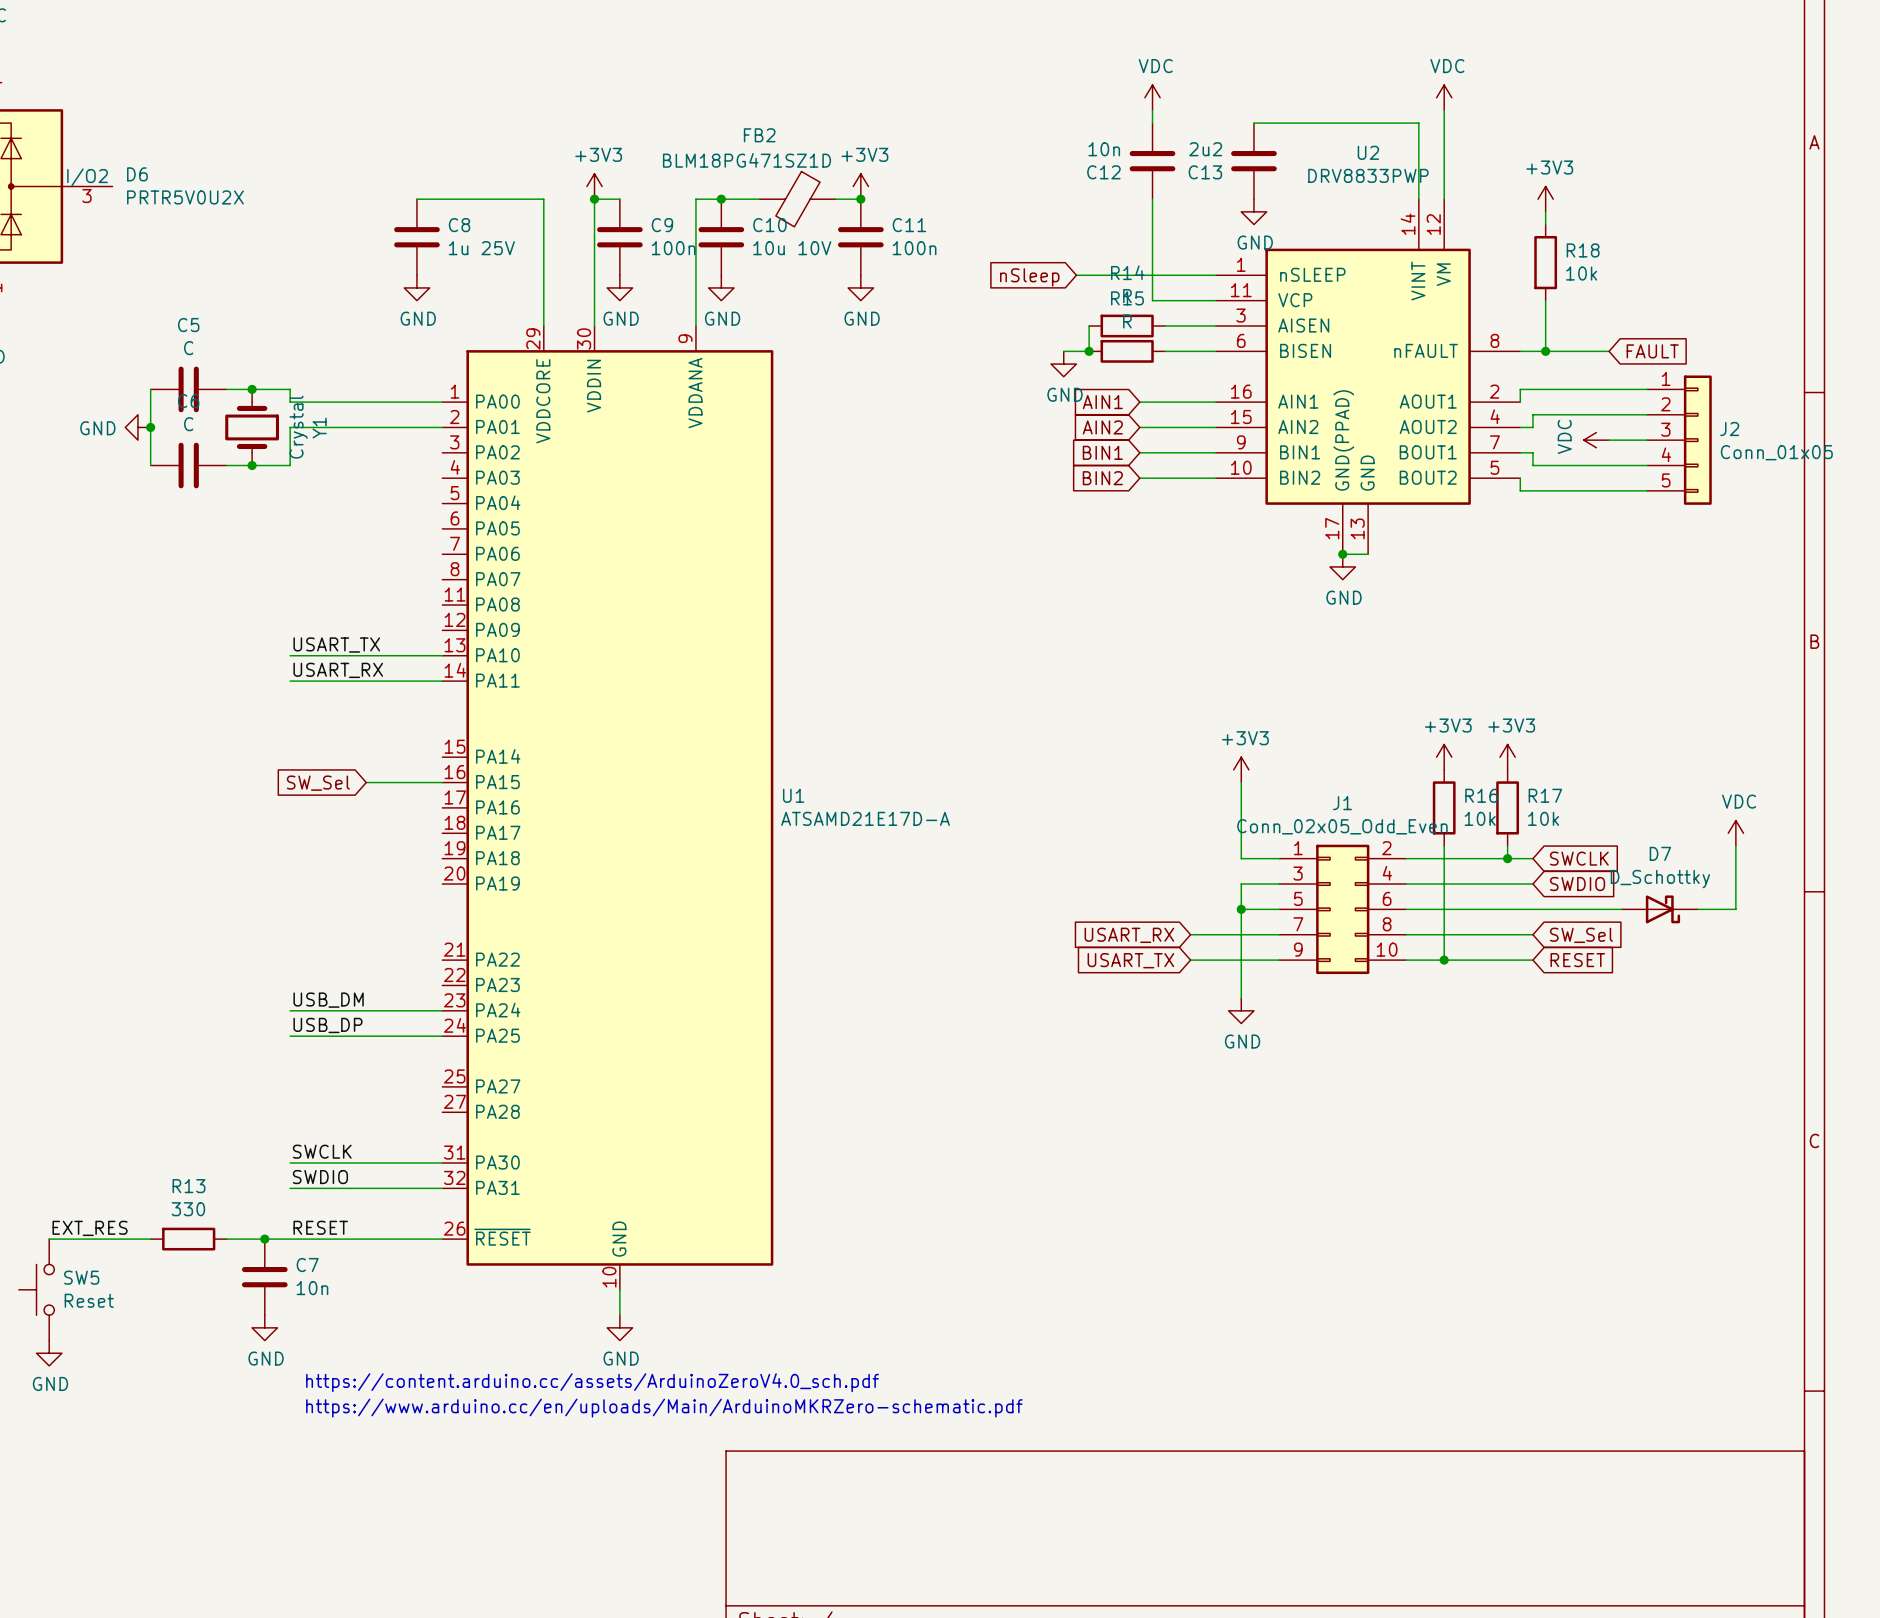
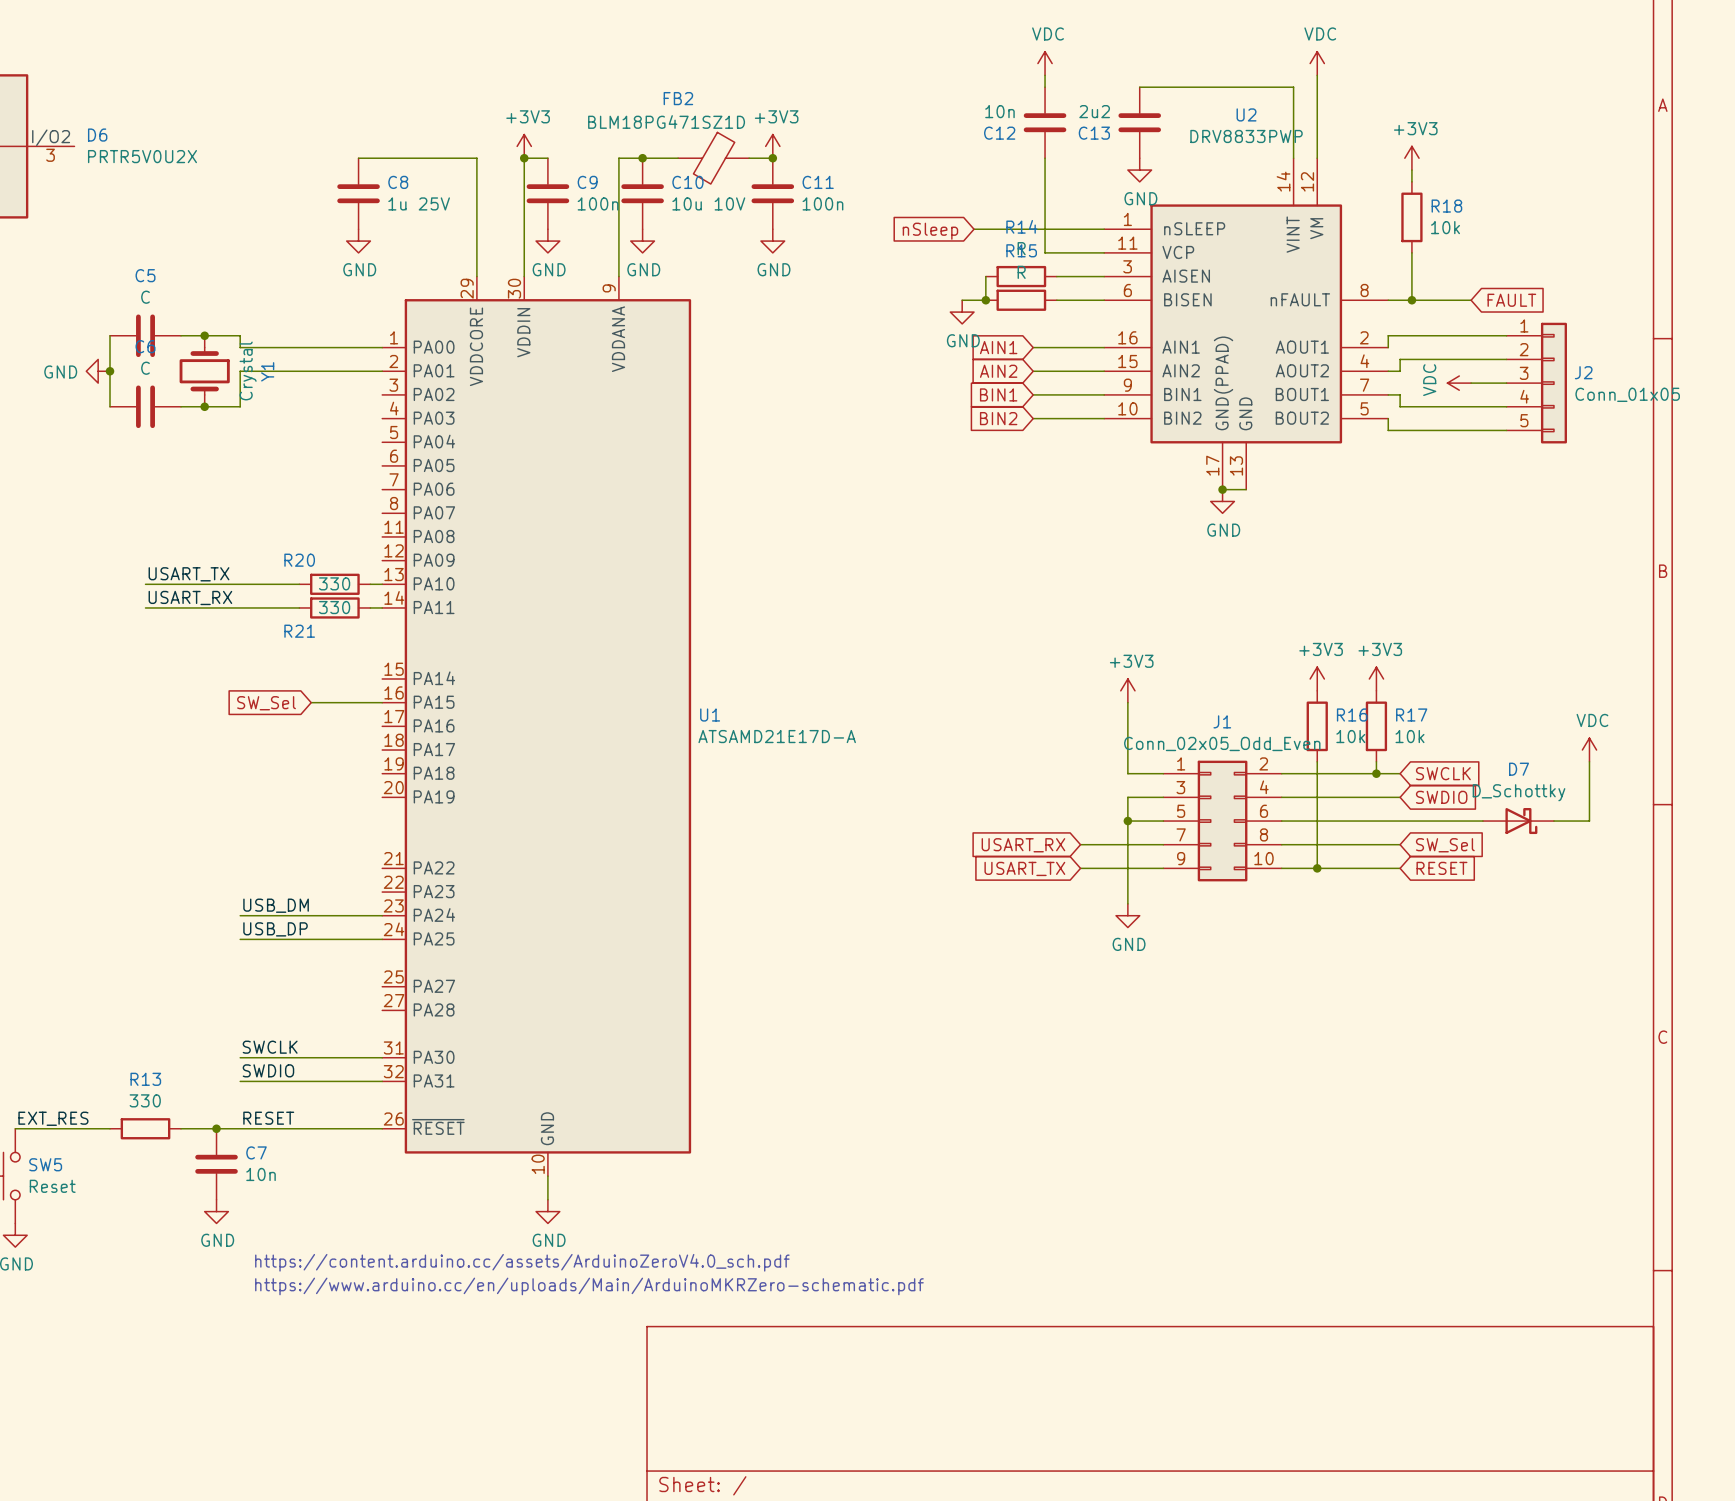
label position: USART_TX (336, 645) -> USART_TX (188, 574)
wire: none -> (145, 584) (240, 584)
wire: (353, 655) (429, 655) -> none
R20: none -> 330 (334, 584)
label position: USART_RX (338, 670) -> USART_RX (190, 597)
wire: none -> (145, 607) (240, 607)
wire: (353, 681) (429, 681) -> none
R21: none -> 330 (334, 607)

